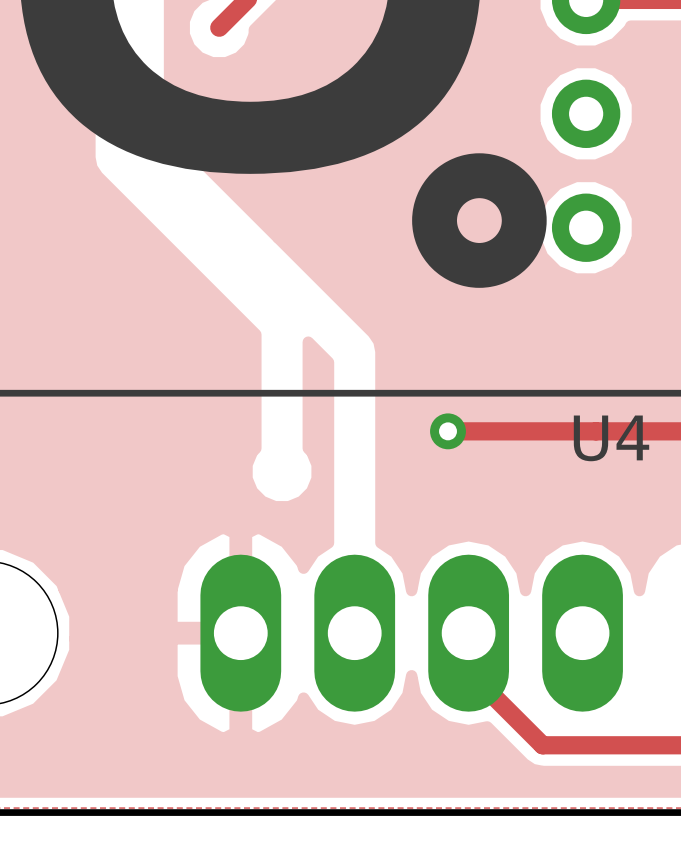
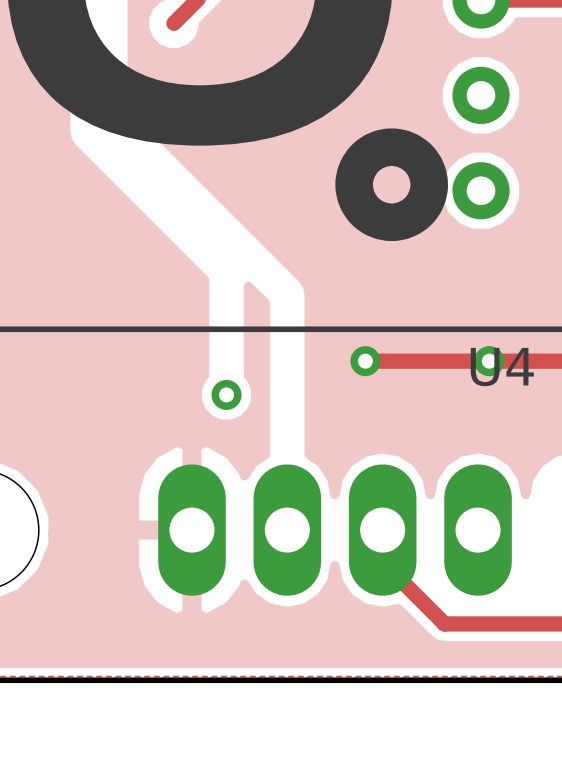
via: none -> (489, 361)
via: none -> (226, 394)

